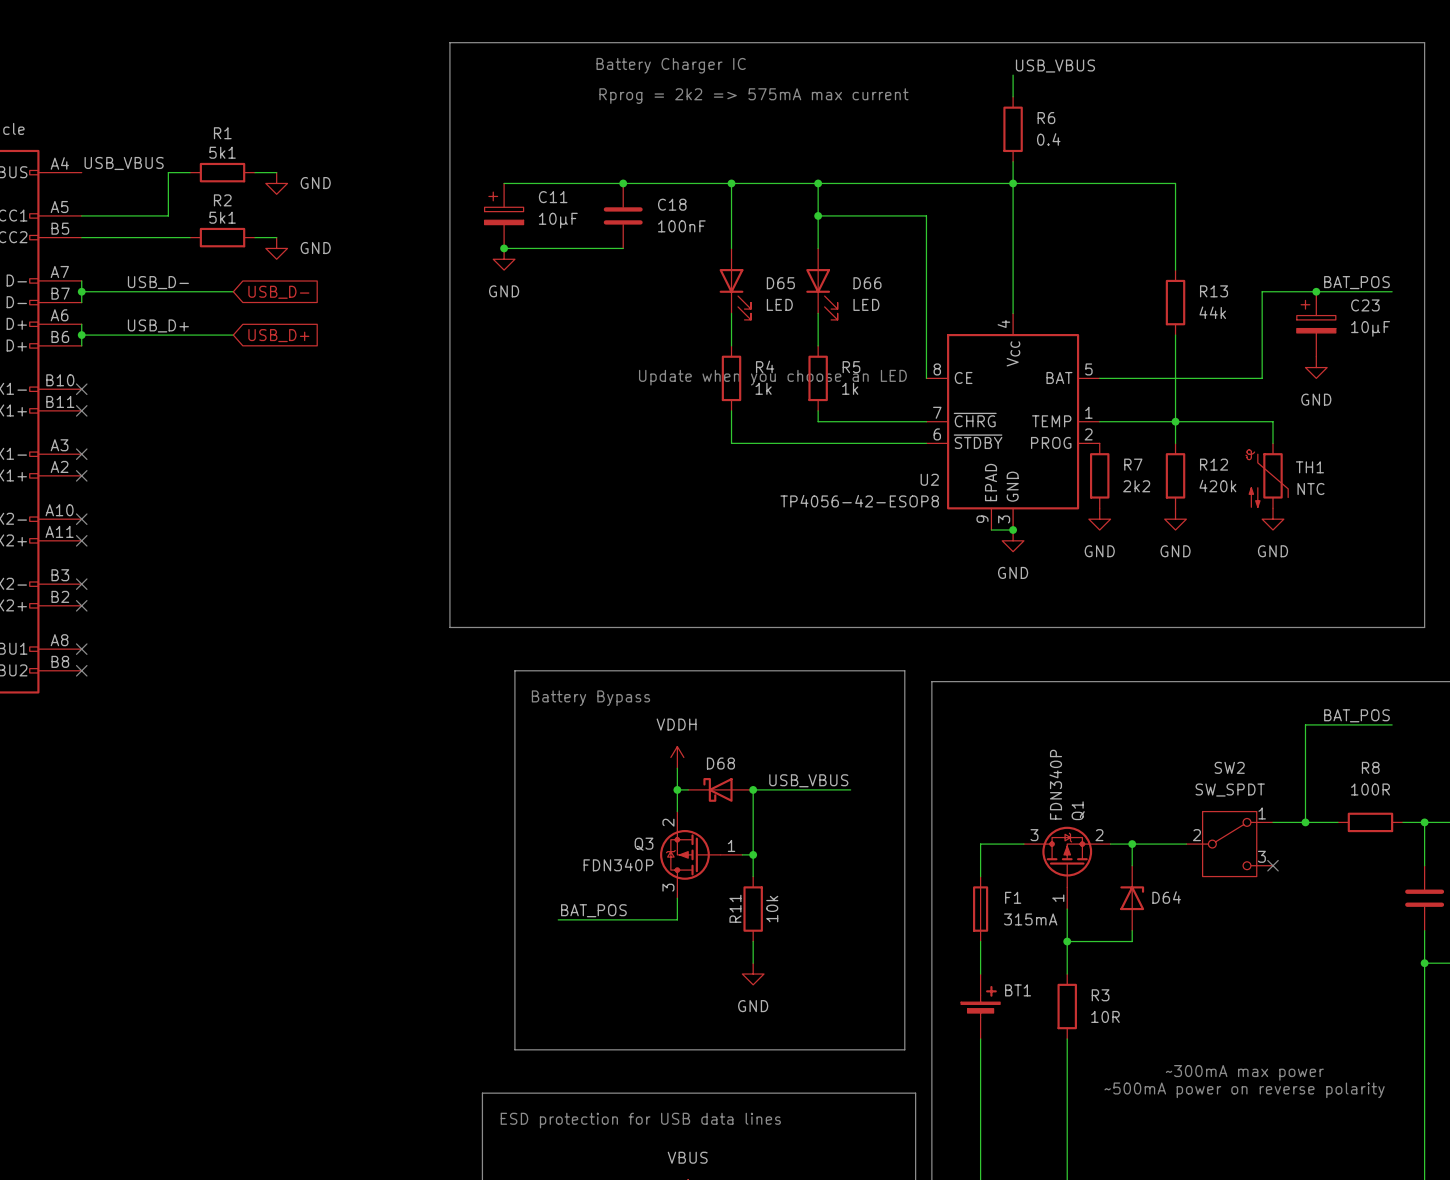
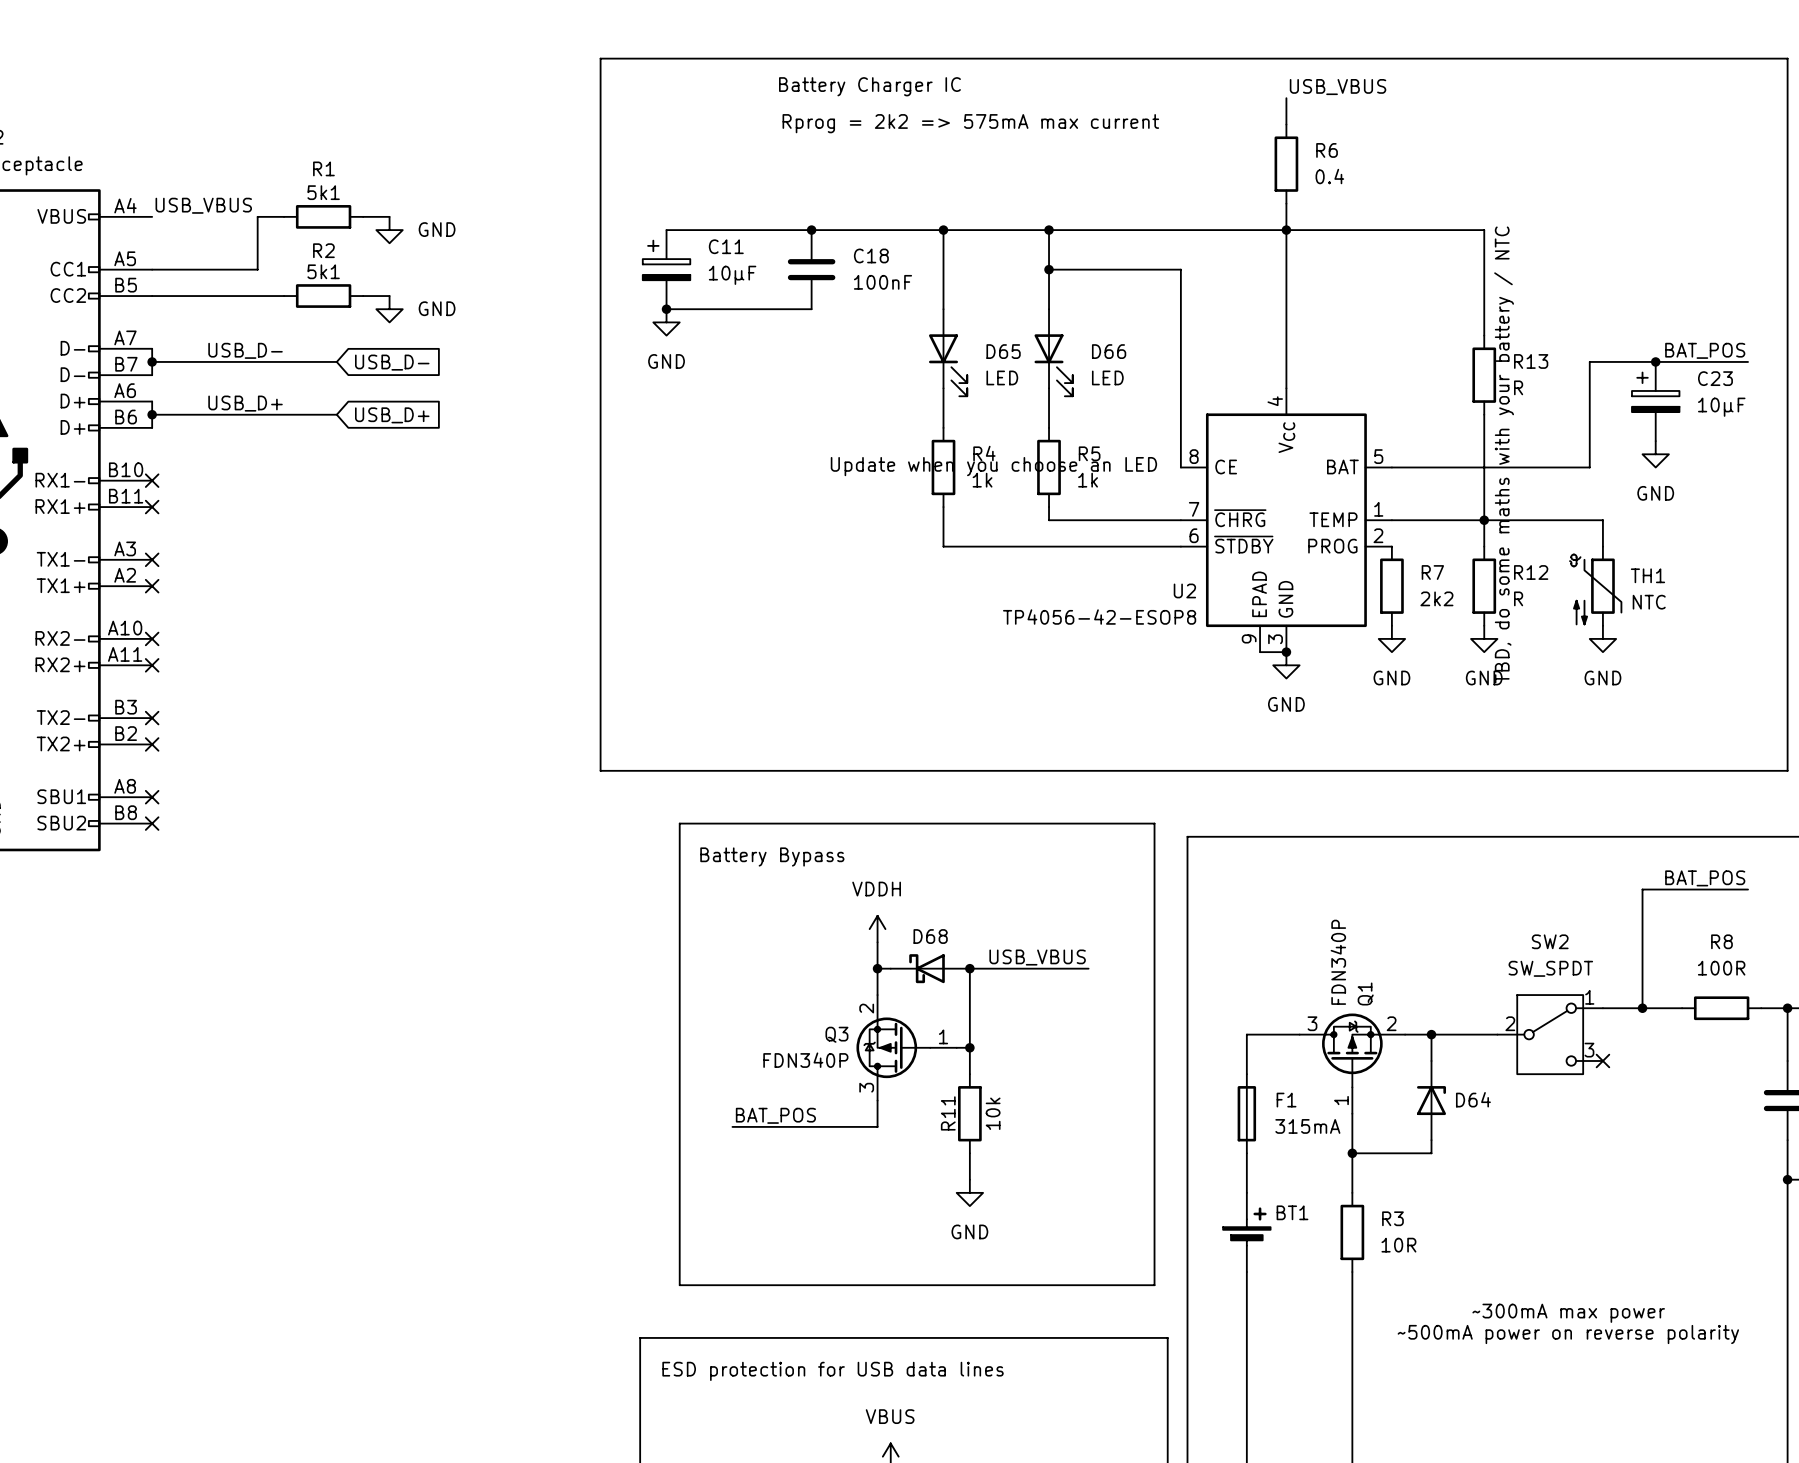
R13 value: 44k (1212, 312) -> R (1518, 387)
text: none -> TBD, do some maths with your battery / NTC (1504, 454)
R12 value: 420k (1217, 486) -> R (1518, 598)

